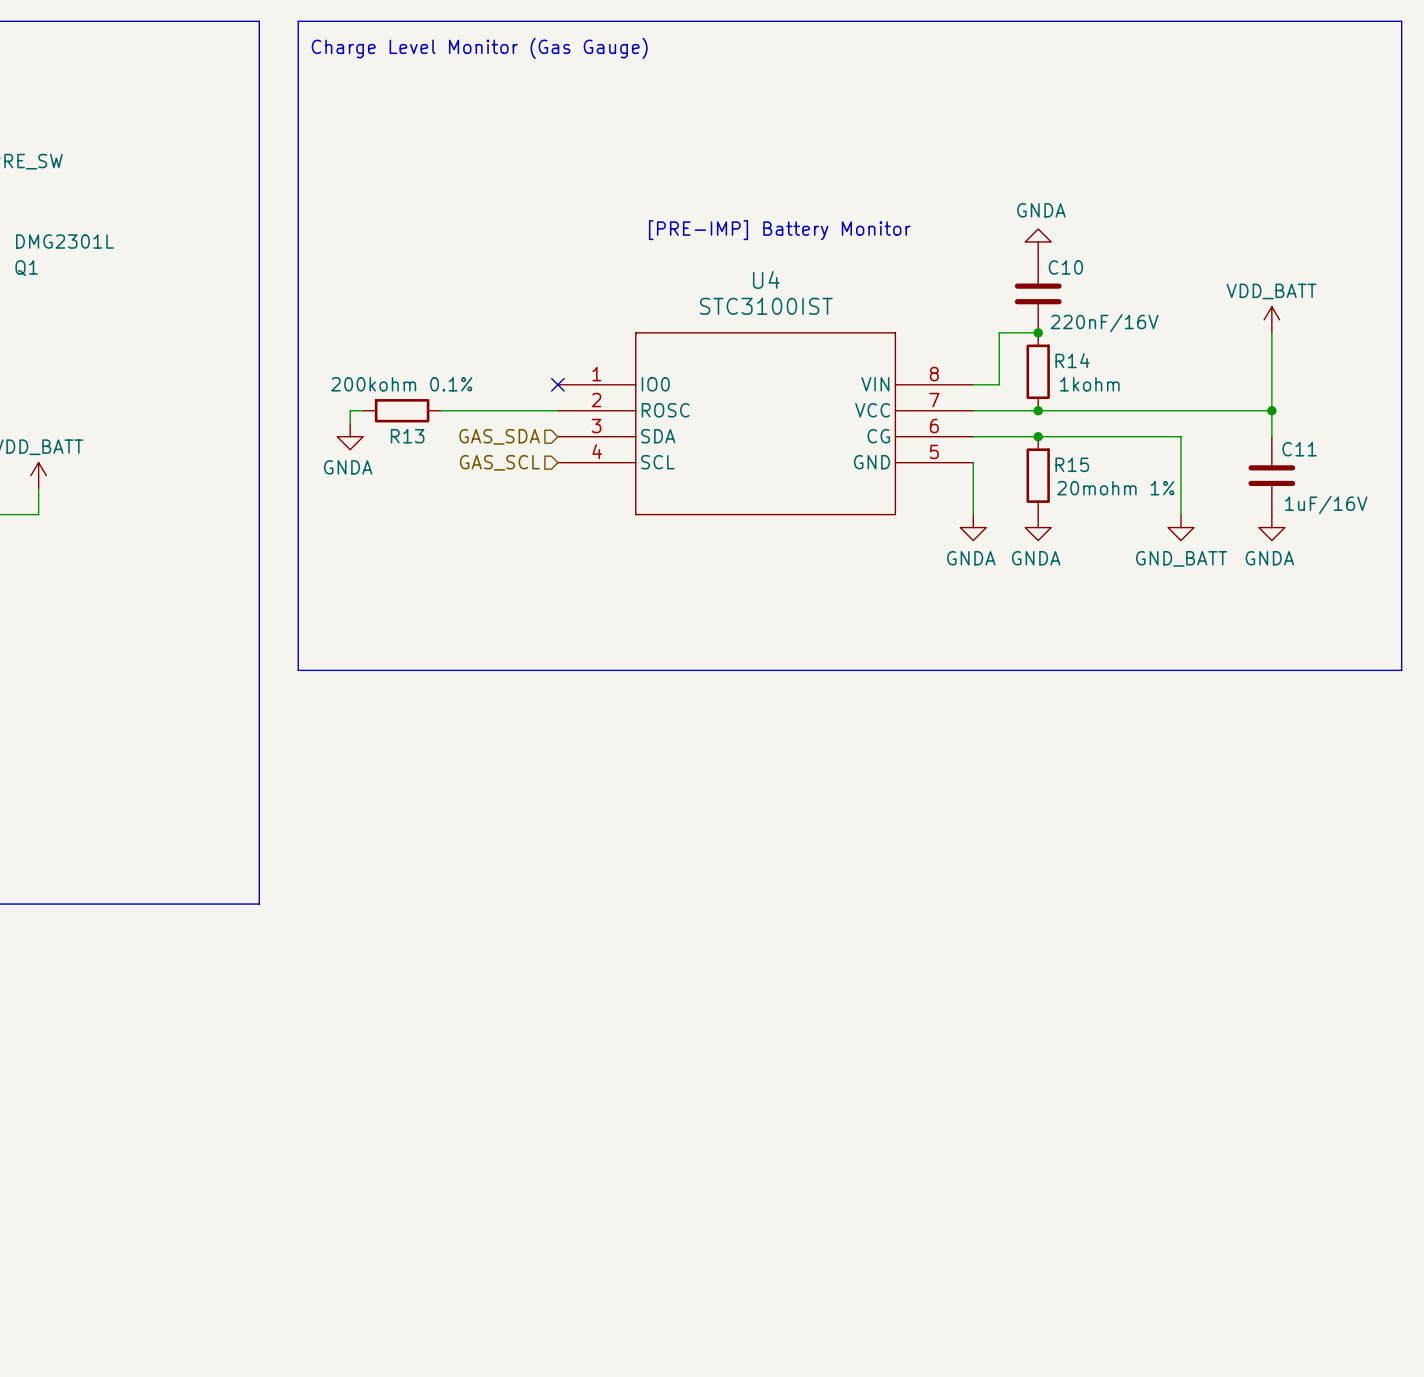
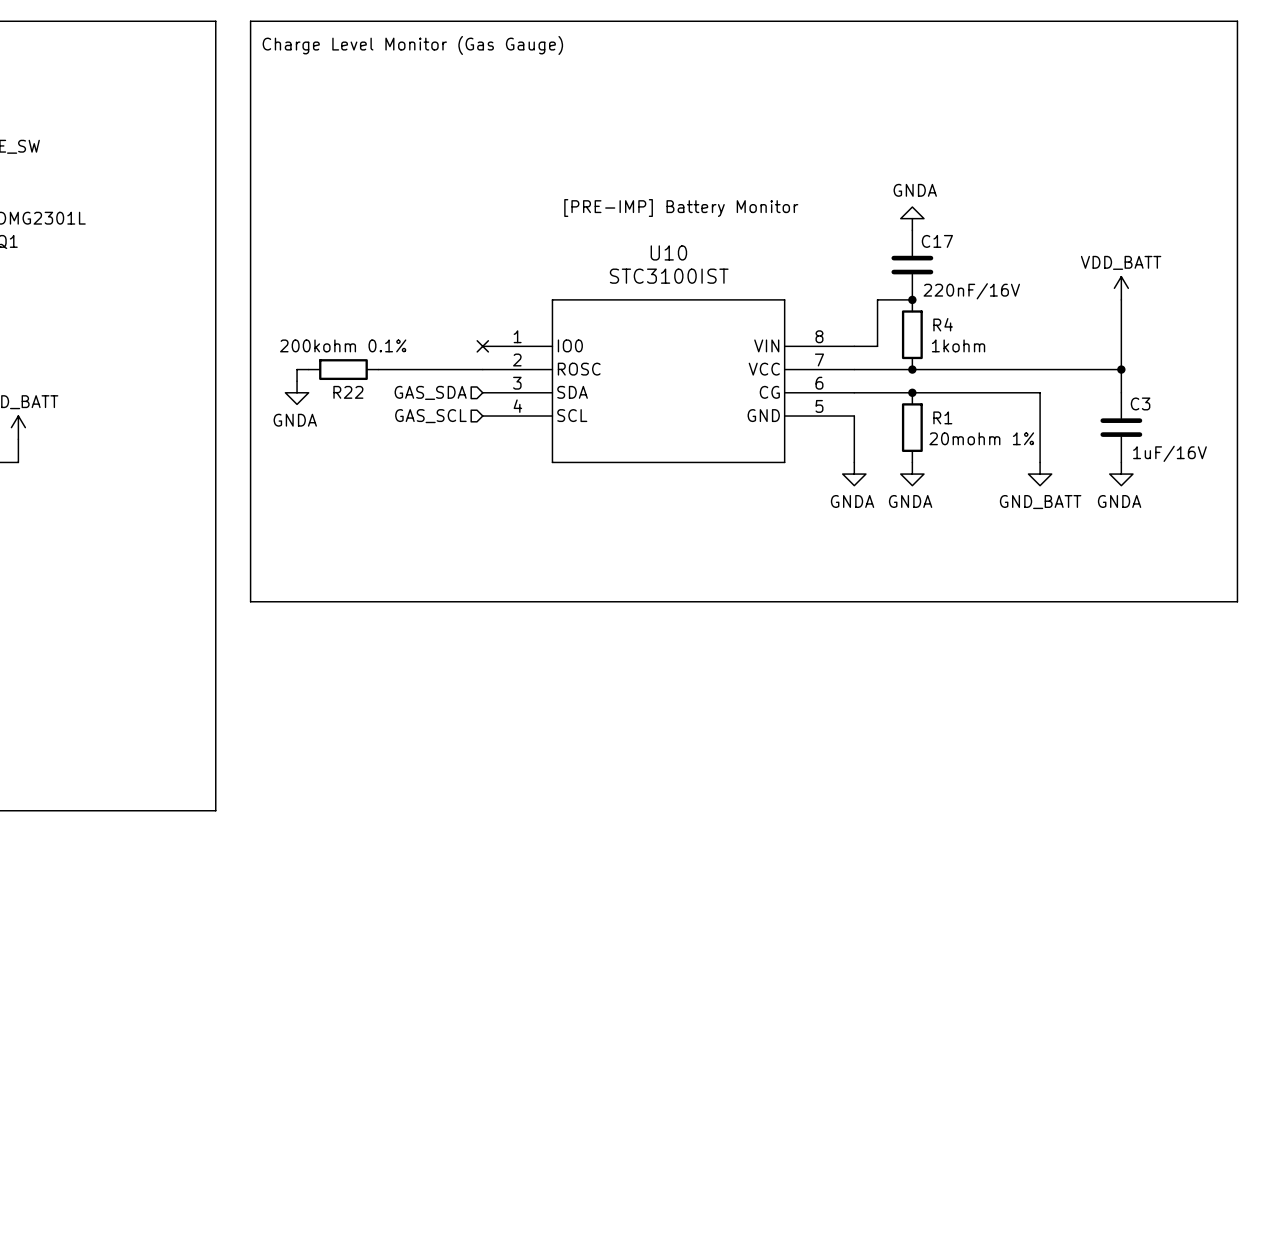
C10 name: C10 (1065, 267) -> C17 (937, 241)
U4 name: U4 (766, 279) -> U10 (668, 252)
R14 name: R14 (1072, 360) -> R4 (943, 324)
R13 name: R13 (407, 436) -> R22 (348, 392)
C11 name: C11 (1299, 449) -> C3 (1140, 403)
R15 name: R15 (1072, 464) -> R1 (942, 417)

